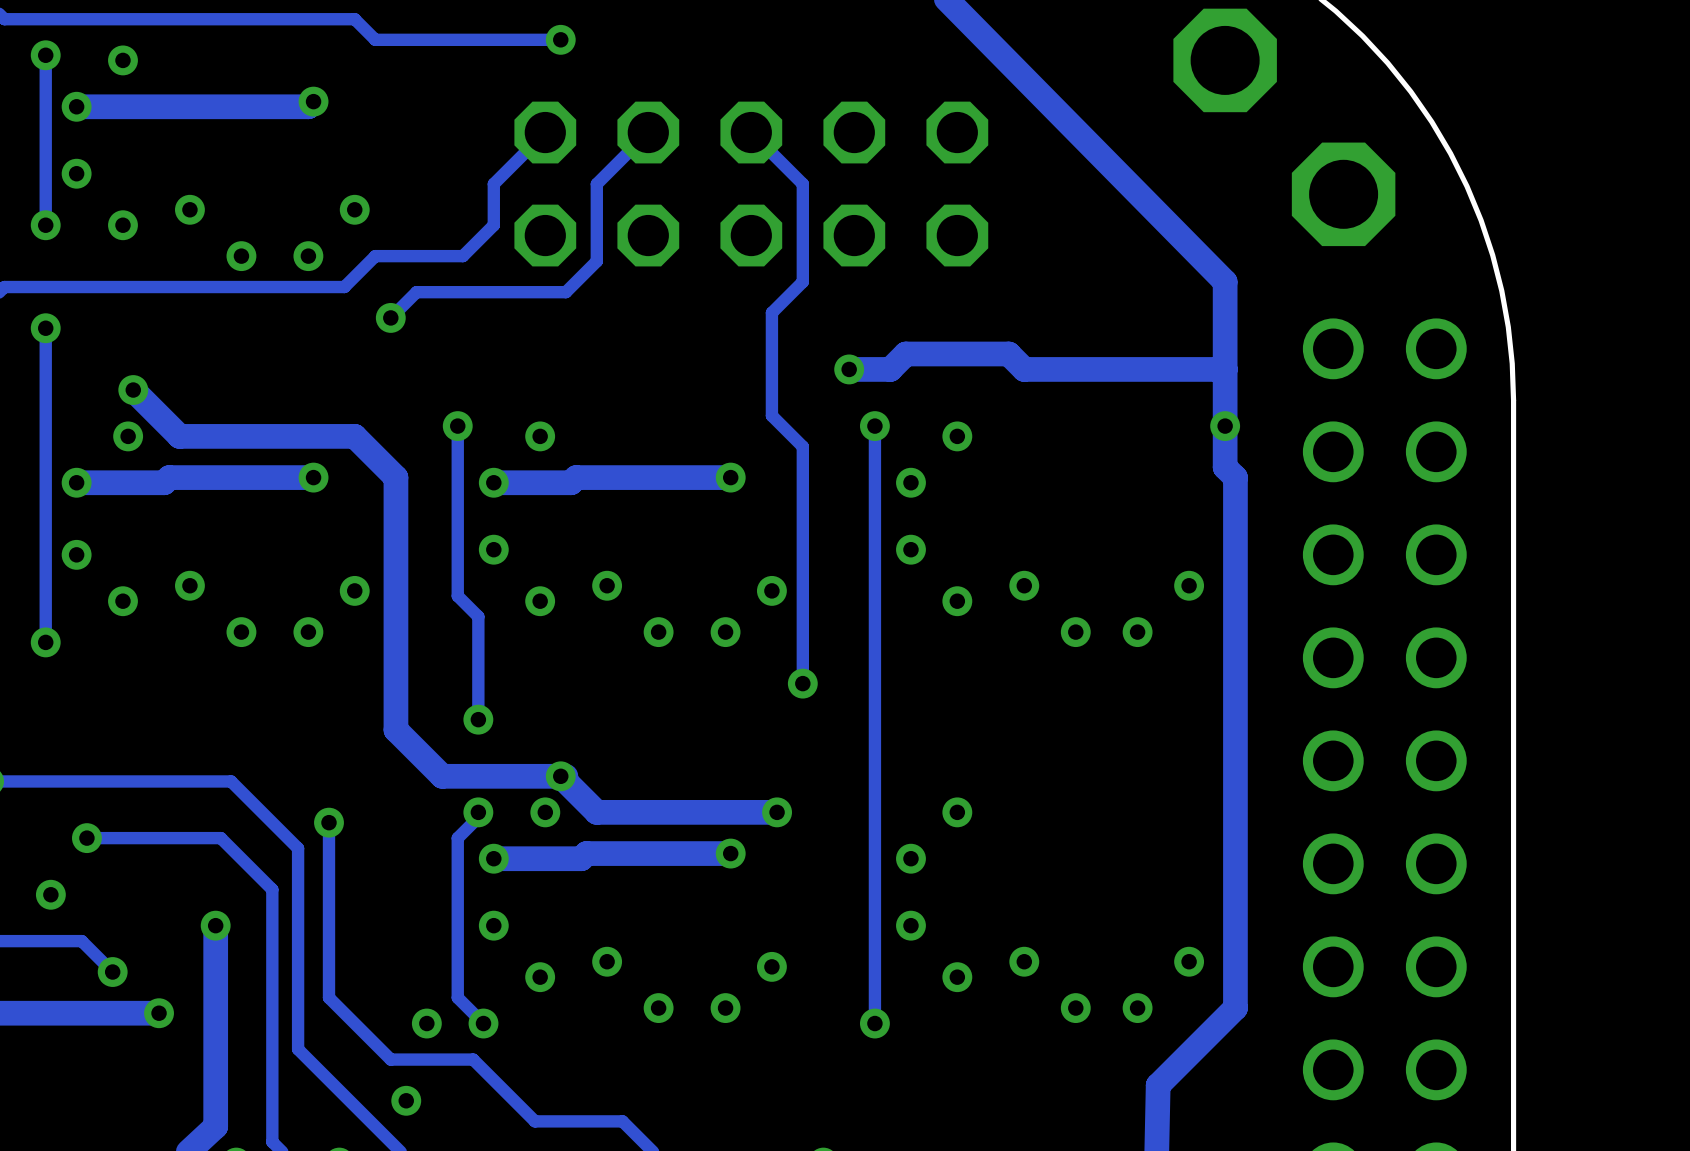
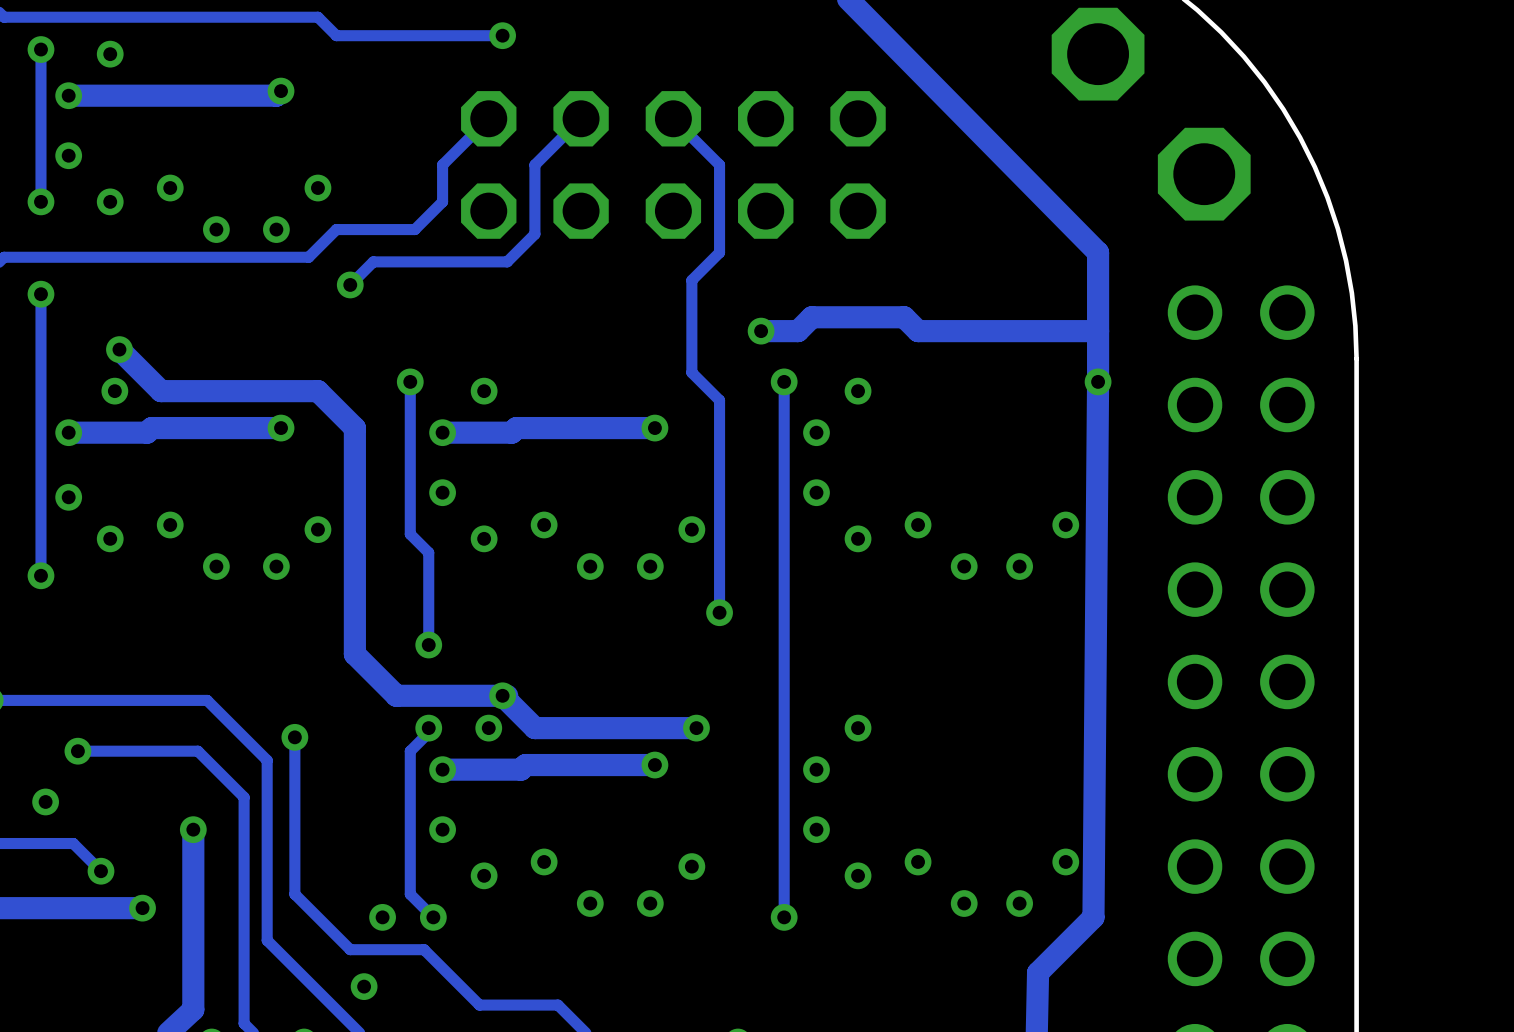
track: (1225, 426) (1225, 467) (1235, 477) (1235, 1008) (1219, 1023) -> (1098, 381) (1093, 917)

